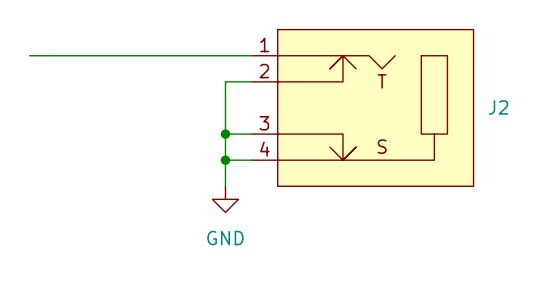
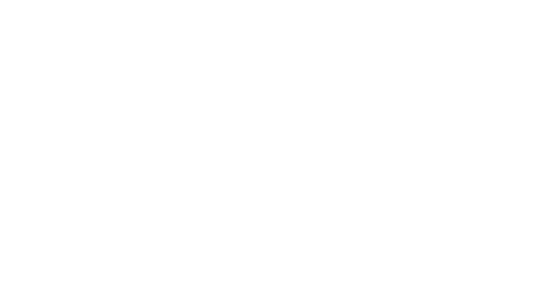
wire: (29, 55) (251, 55) -> none
wire: (251, 81) (225, 81) (225, 186) -> none
J2: (362, 107) -> none
wire: (225, 134) (251, 134) -> none
junction: (225, 134) -> none
wire: (225, 160) (251, 160) -> none
junction: (225, 160) -> none
power symbol: GND (225, 199) -> none

